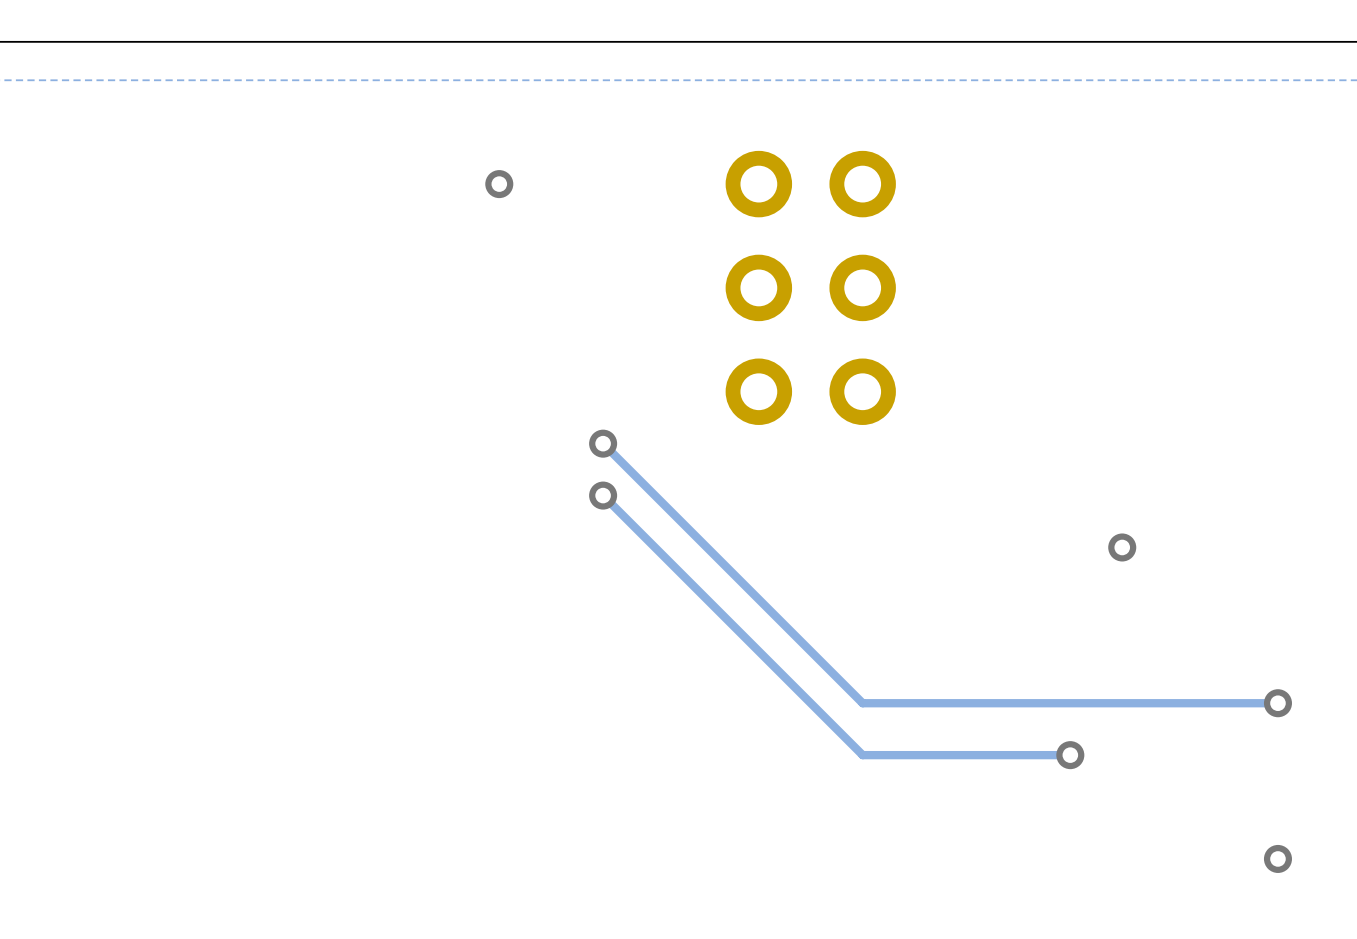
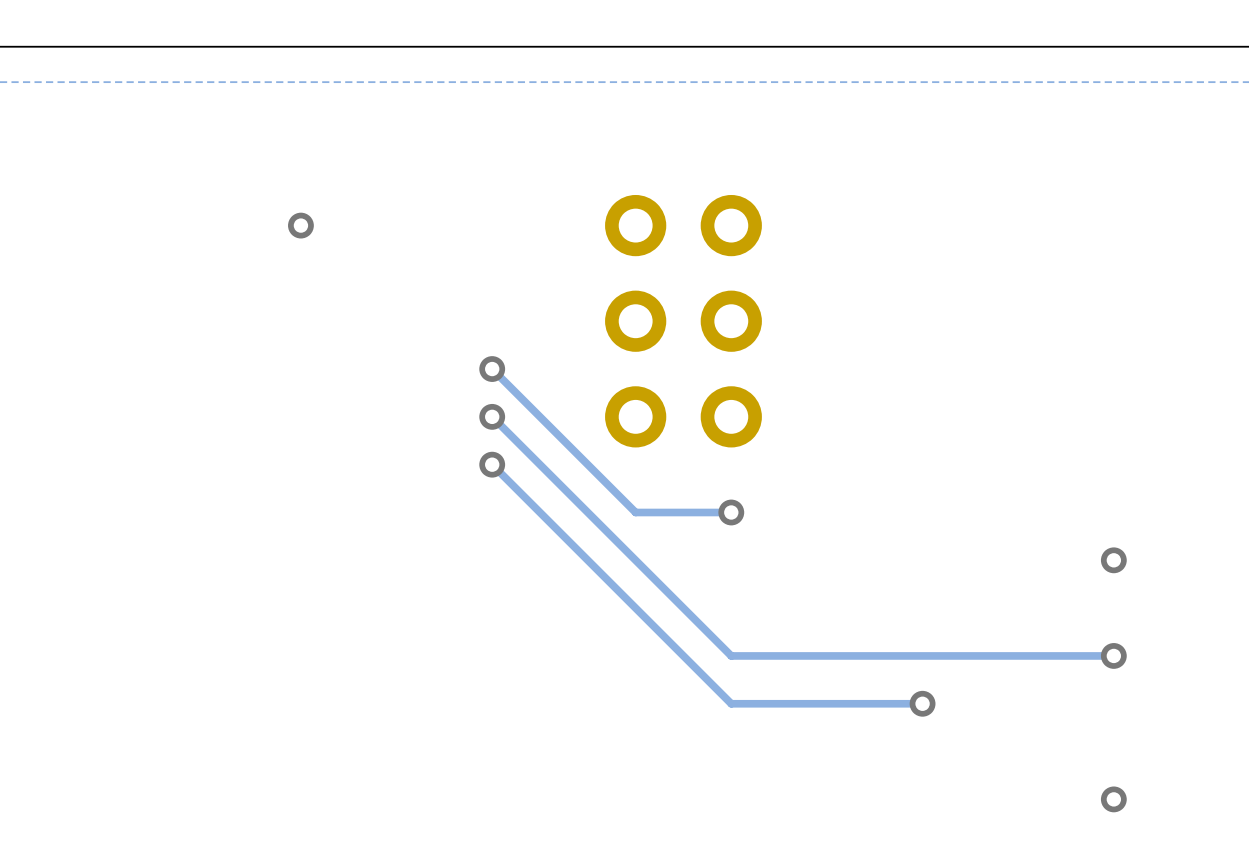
via: (499, 184) -> none
via: none -> (300, 225)
part position: (810, 287) -> (683, 321)
track: none -> (492, 369) (635, 512) (731, 512)
via: none -> (492, 369)
via: none -> (731, 512)
via: (1122, 547) -> none
via: none -> (1113, 560)

